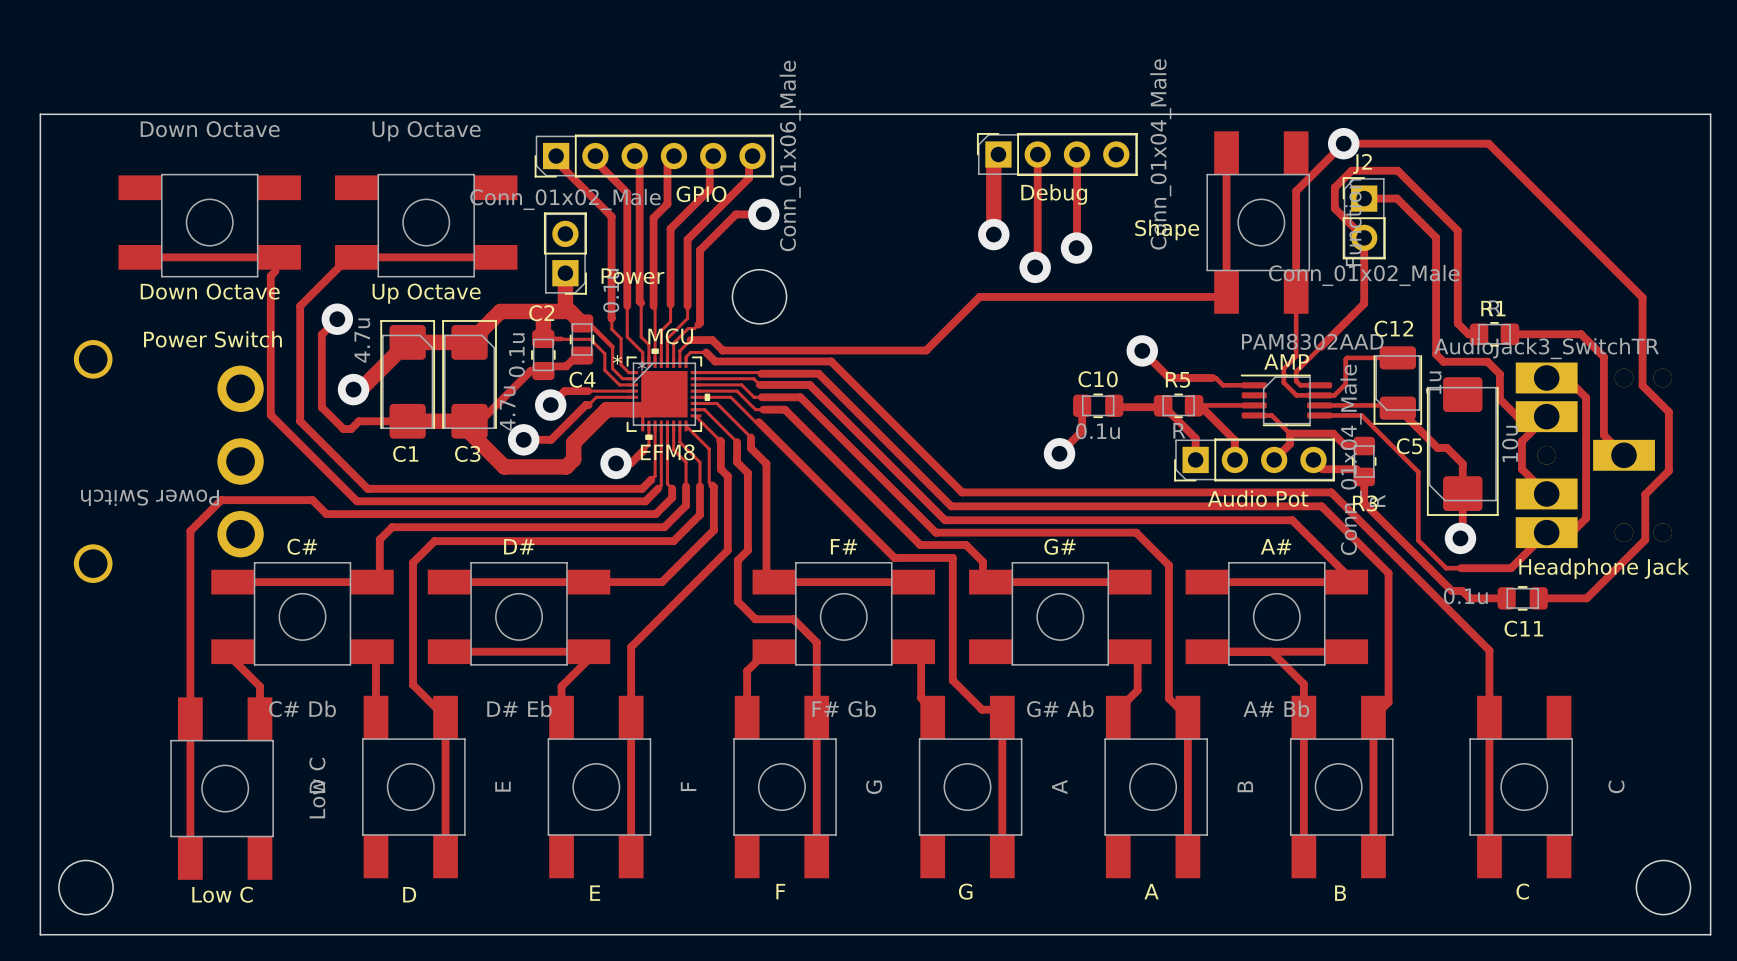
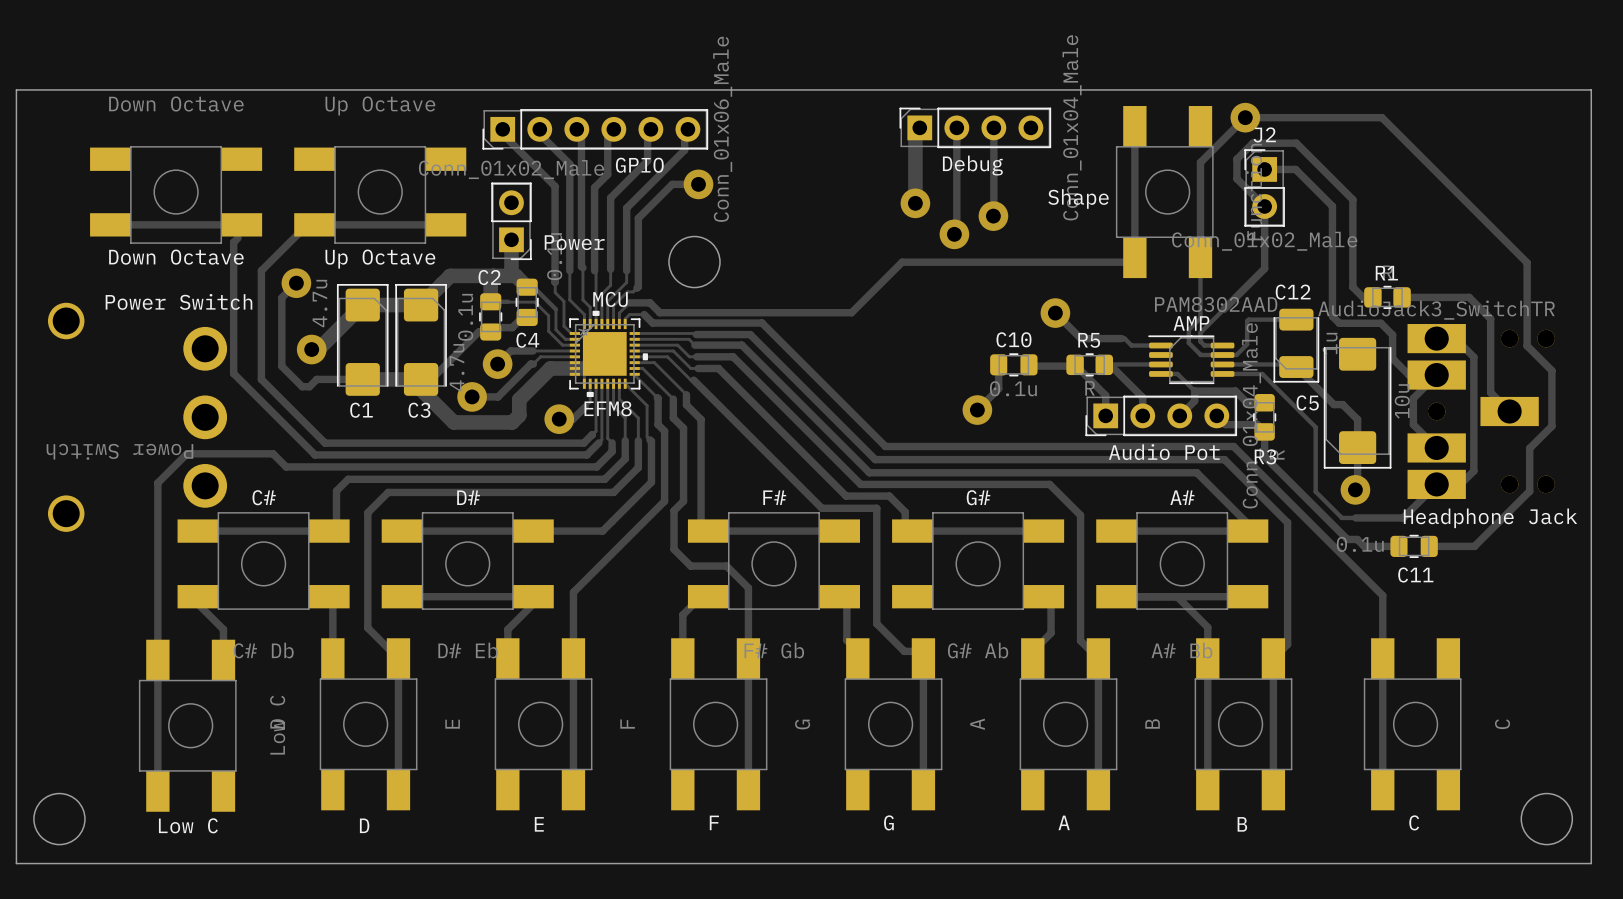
MCU text: * (617, 359) -> none

